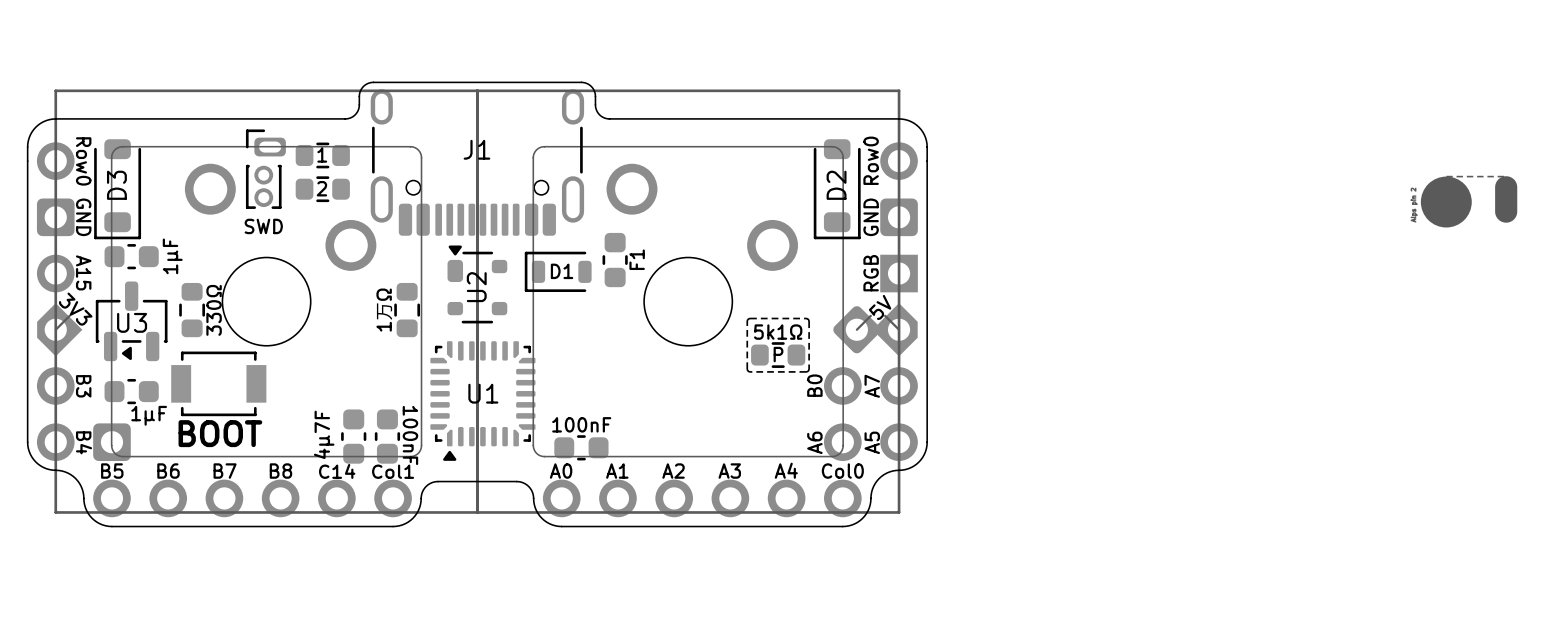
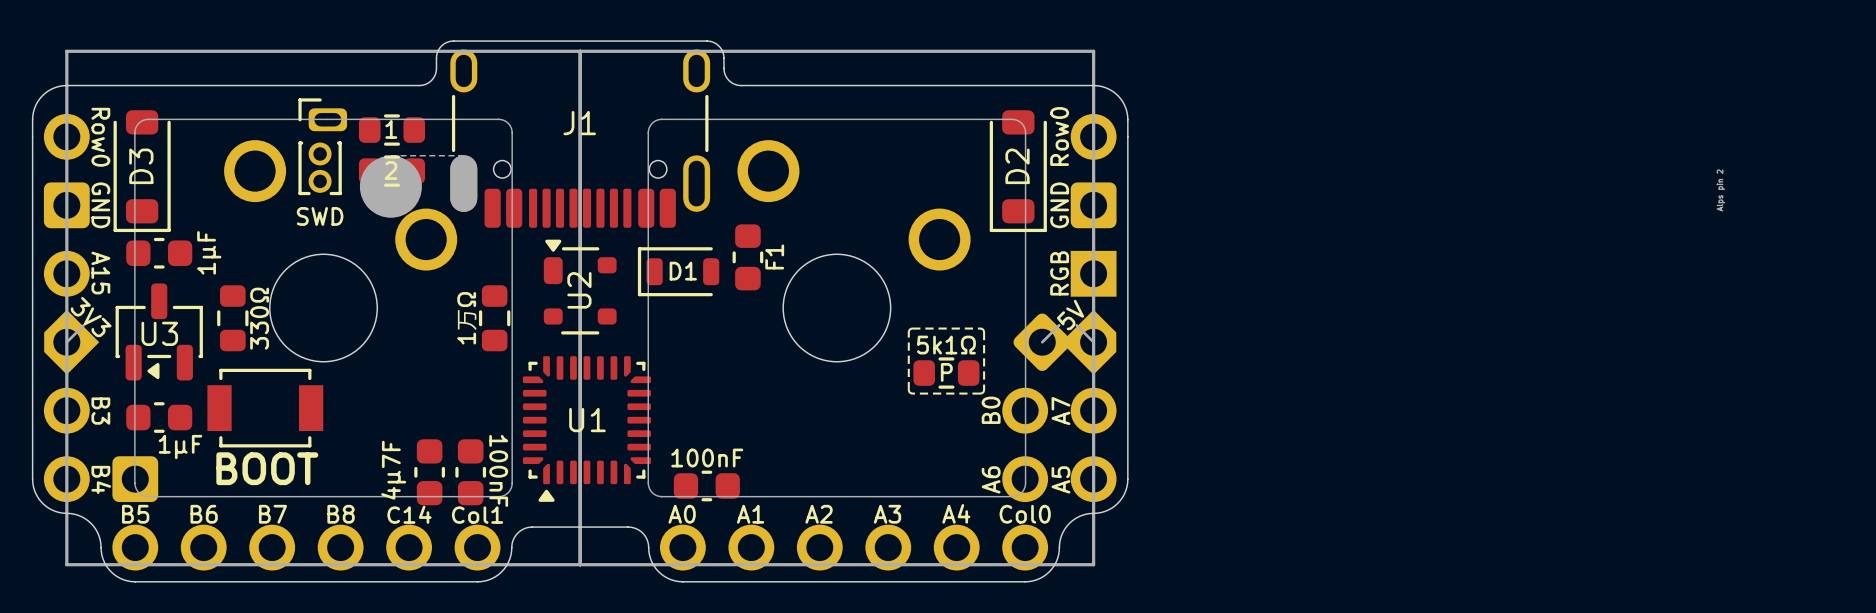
drawing: none -> [359, 155, 478, 218]
line: none -> (390, 155) (463, 155)
drawing: [1420, 176, 1518, 228] -> none
line: (1446, 176) (1505, 176) -> none

